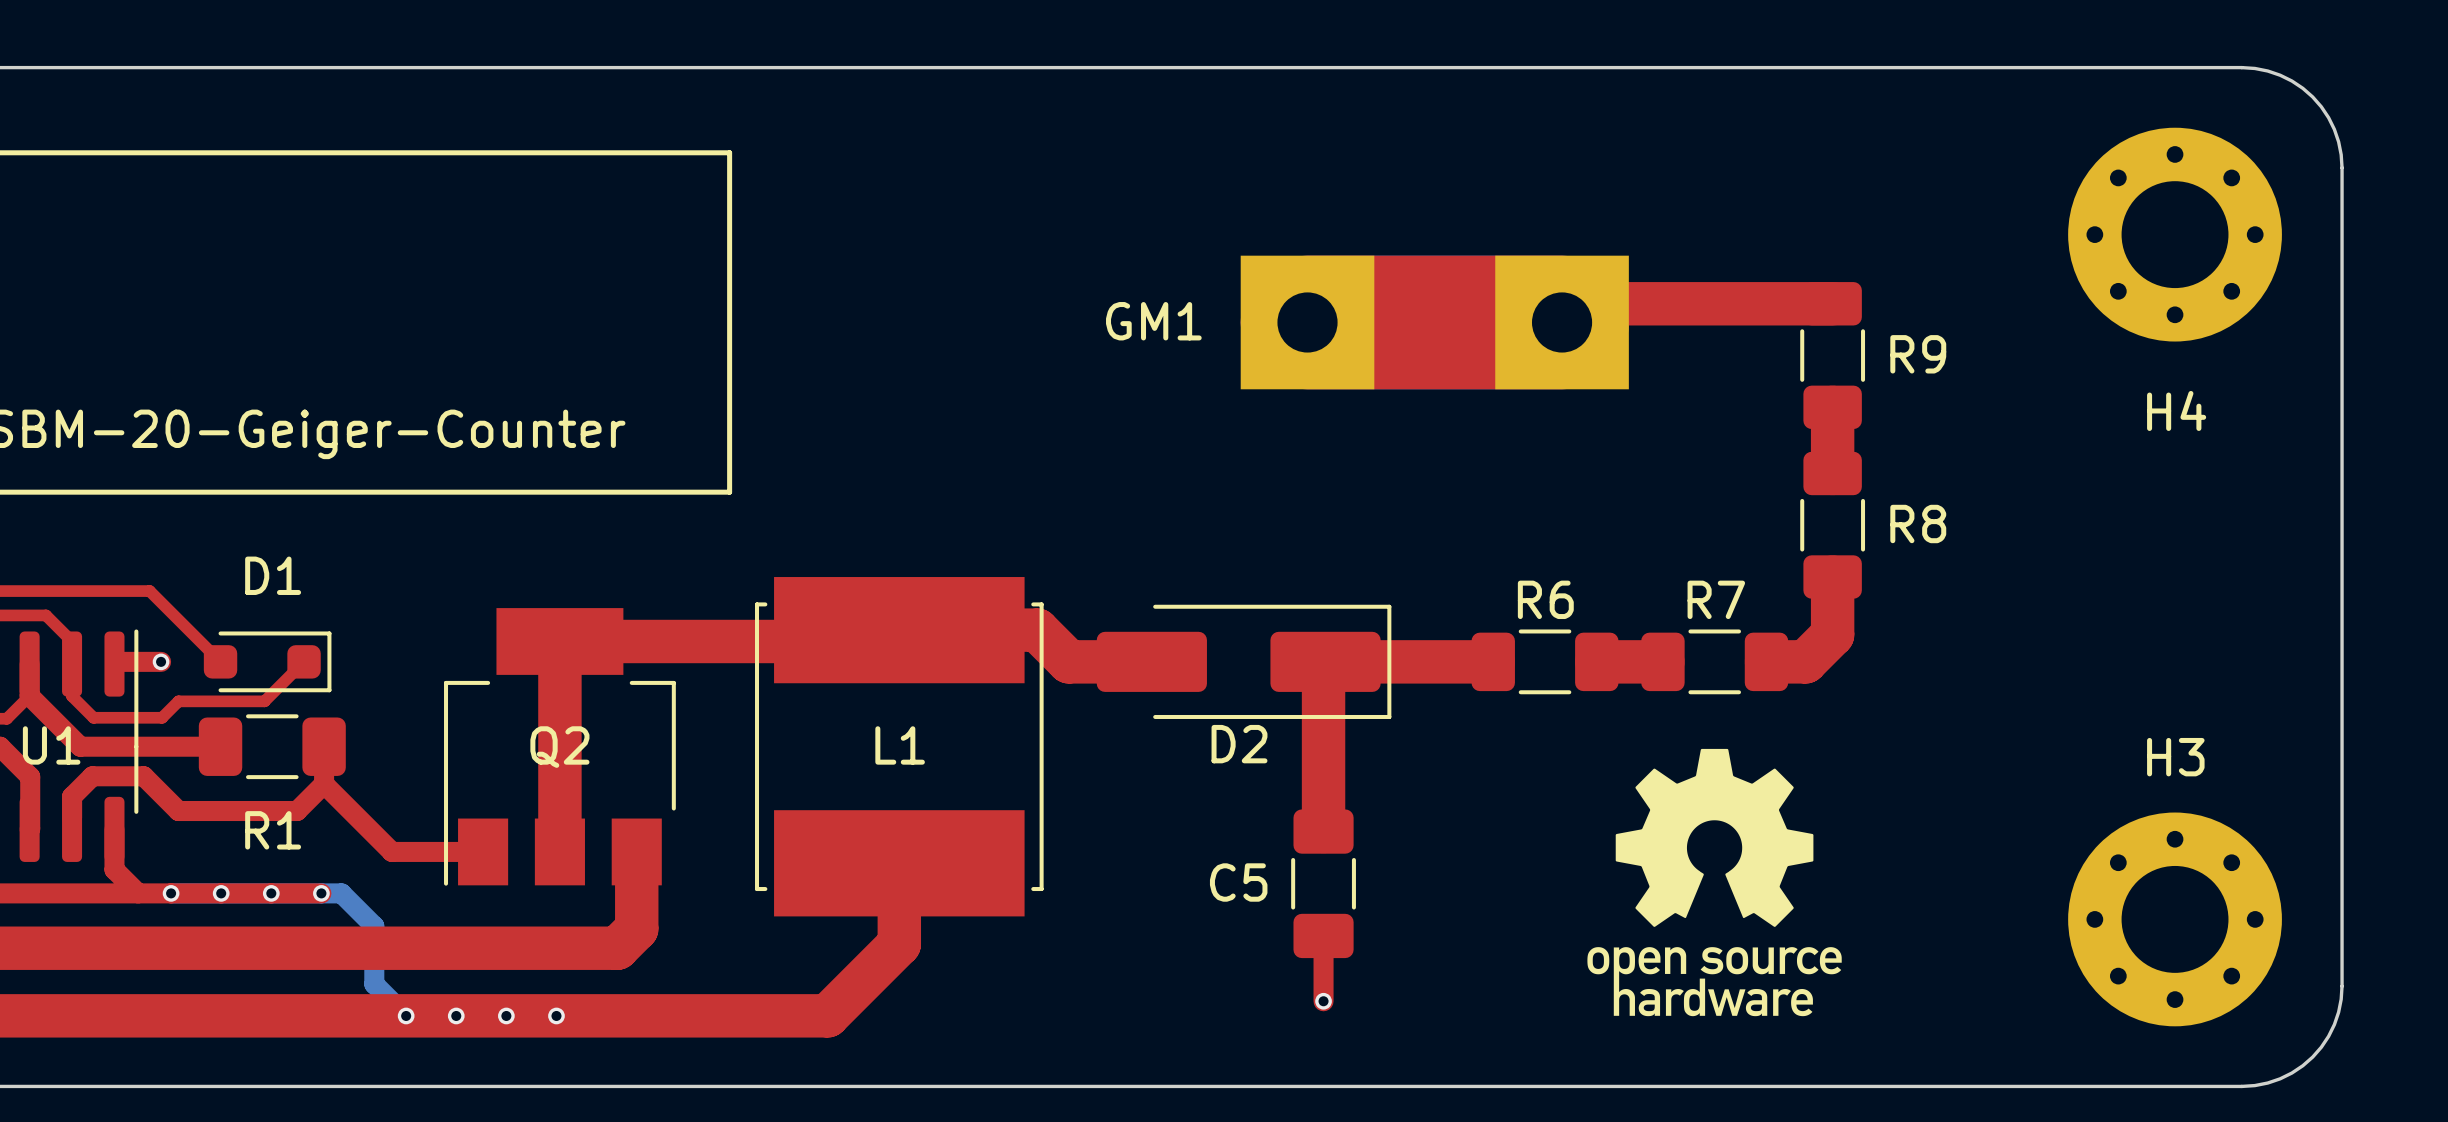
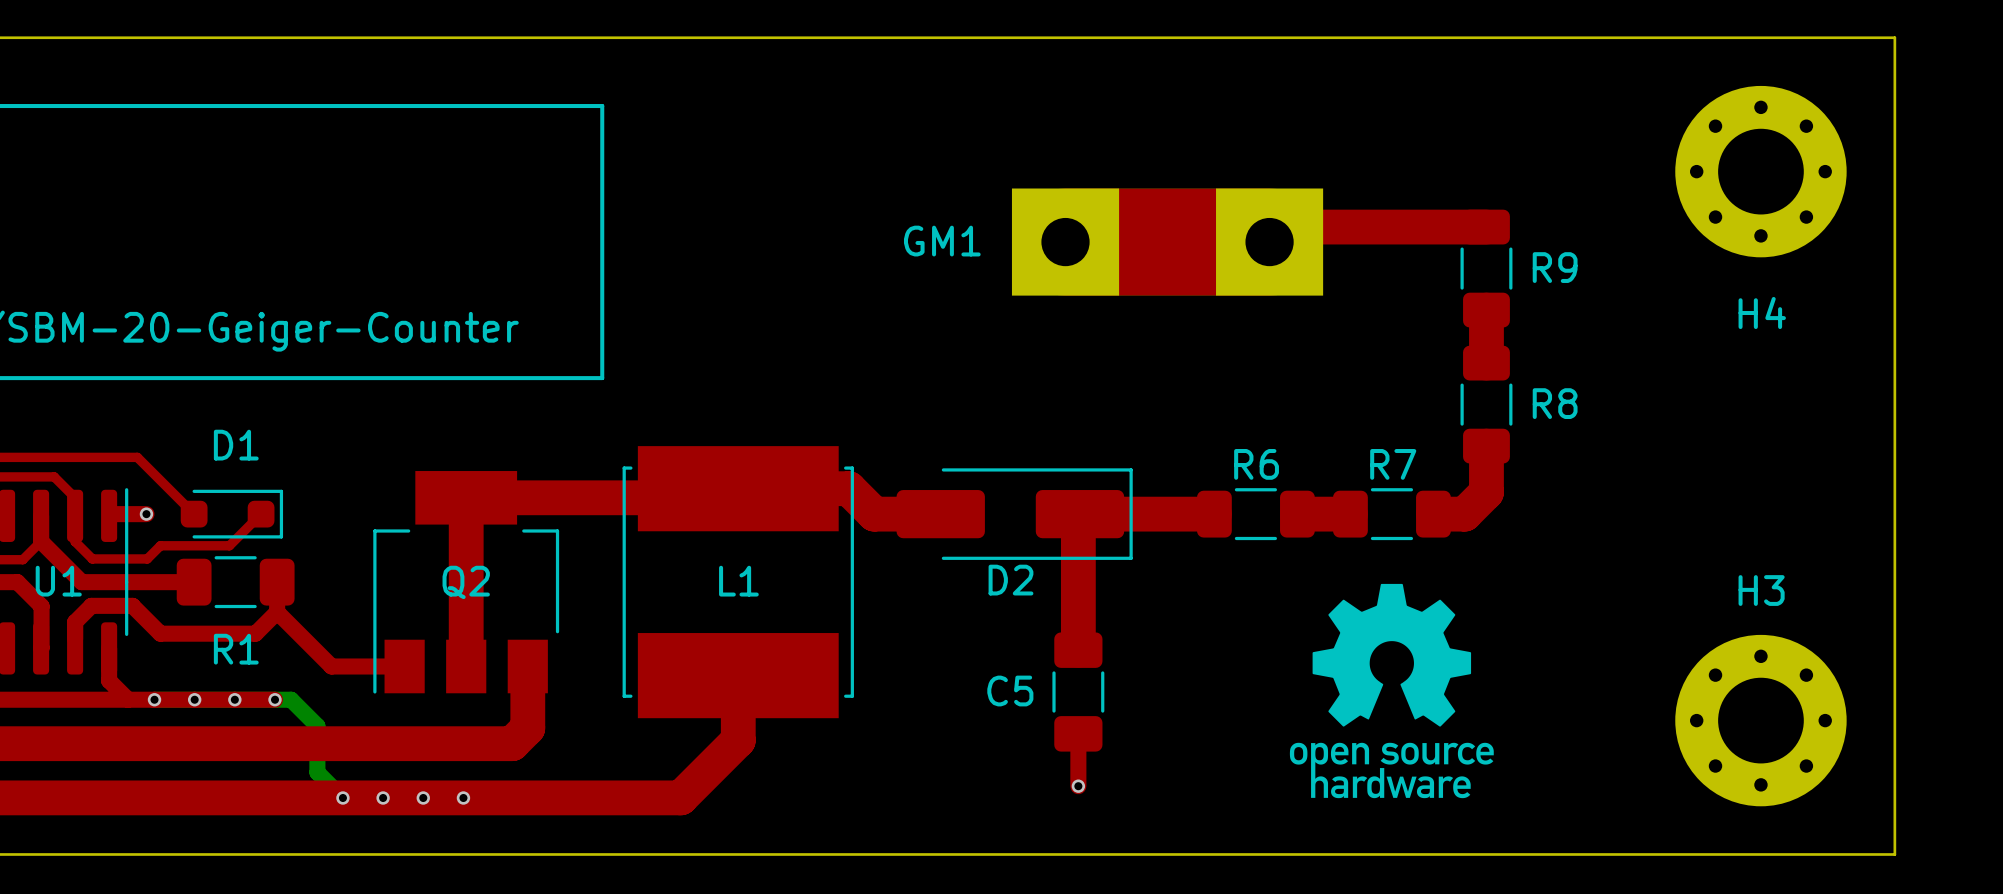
board edge: (2241, 67) (2267, 71) (2280, 75) (2302, 88) (2312, 96) (2321, 106) (2334, 129) (2338, 141) (2342, 167) -> (1814, 37) (1894, 37) (1894, 118)
board edge: (2342, 986) (2338, 1012) (2334, 1024) (2321, 1047) (2312, 1057) (2302, 1065) (2280, 1078) (2267, 1083) (2241, 1086) -> (1894, 774) (1894, 854) (1814, 854)

